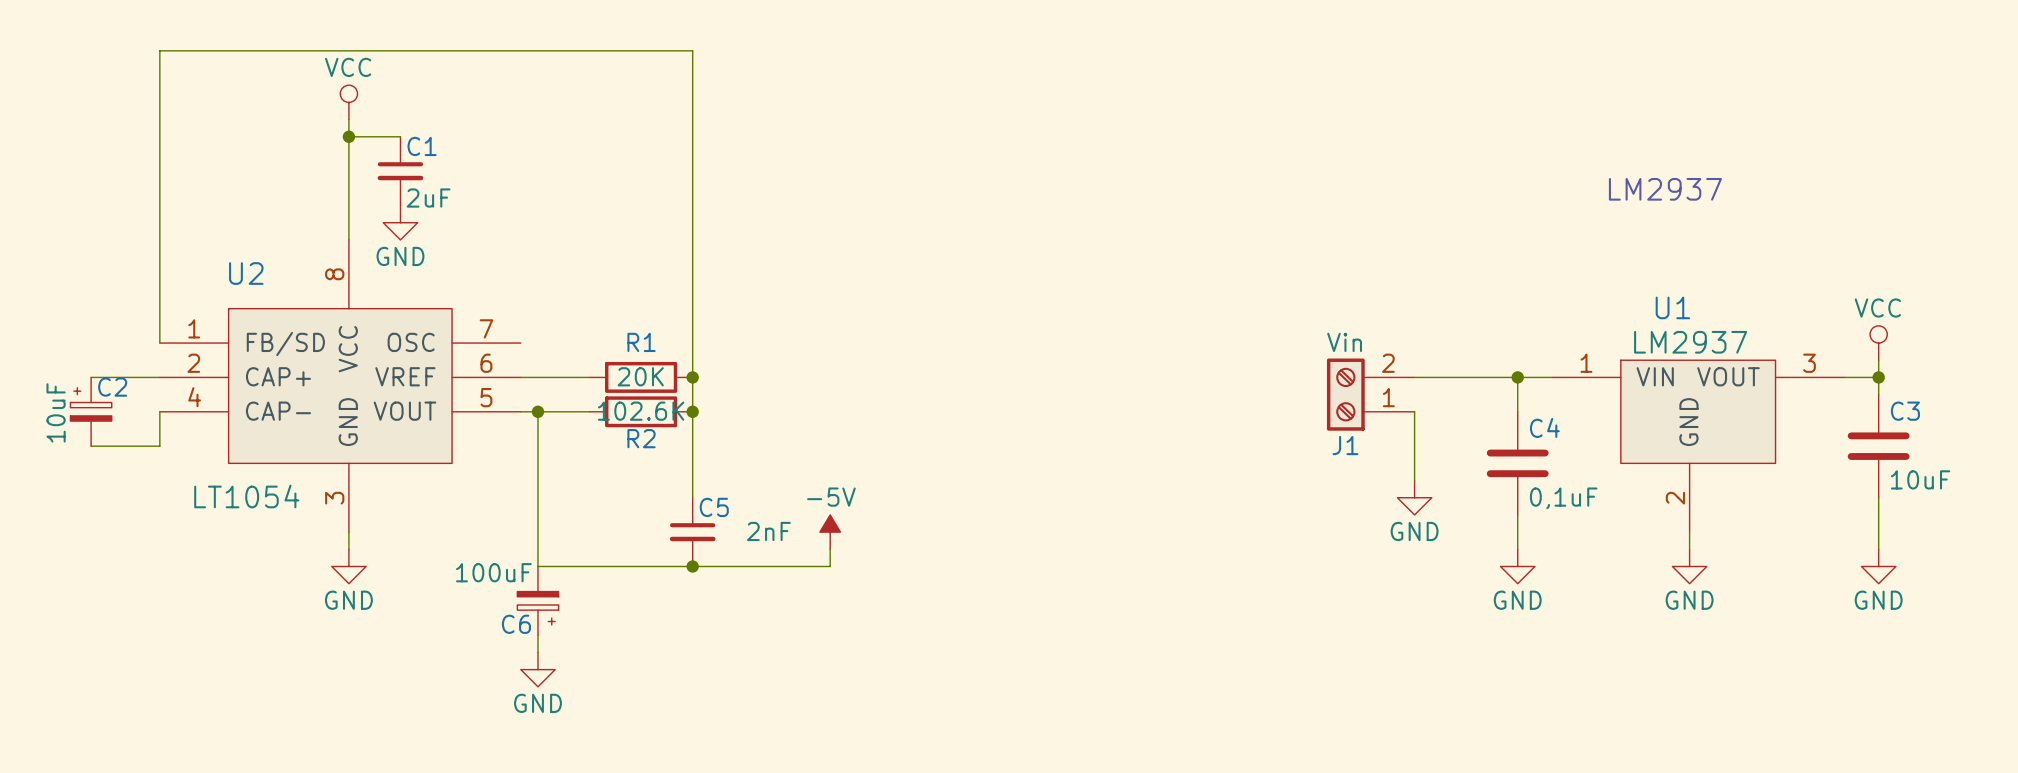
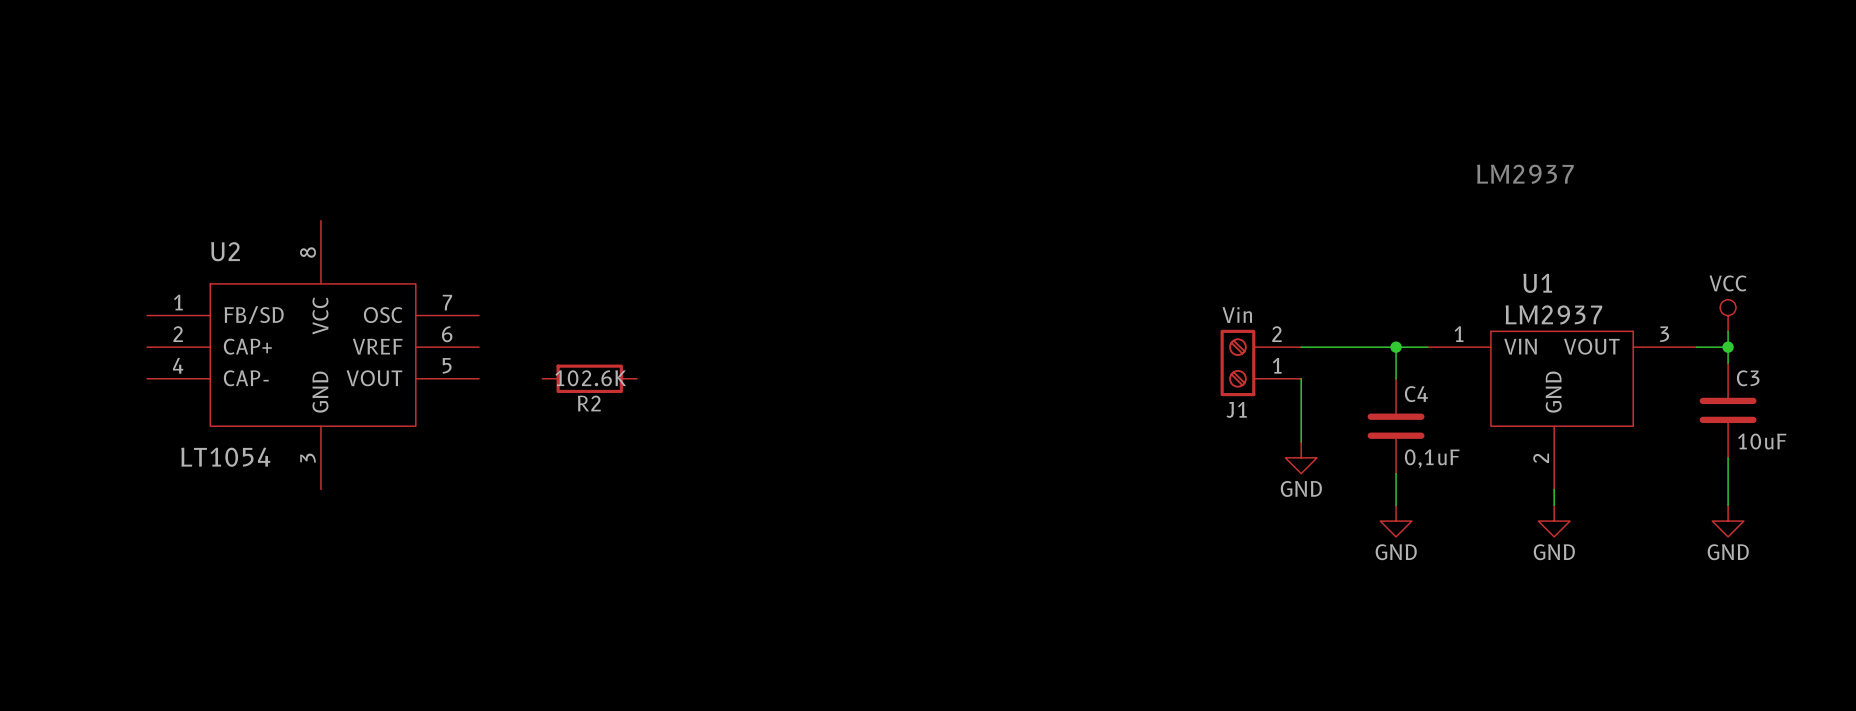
power symbol: VCC (348, 102) -> none
wire: (348, 119) (348, 239) -> none
wire: (348, 136) (400, 136) -> none
junction: (348, 136) -> none
C1: 2uF (400, 171) -> none
power symbol: GND (400, 222) -> none
wire: (159, 343) (159, 50) (692, 50) (692, 497) -> none
wire: (91, 377) (159, 377) -> none
wire: (520, 377) (589, 377) -> none
R1: 20K (641, 377) -> none
junction: (692, 377) -> none
C2: 10uF (91, 411) -> none
wire: (159, 411) (159, 446) (91, 446) -> none
wire: (520, 411) (589, 411) -> none
wire: (537, 411) (537, 566) (830, 566) (830, 549) -> none
junction: (537, 411) -> none
junction: (692, 411) -> none
wire: (348, 532) (348, 549) -> none
C5: 2nF (692, 532) -> none
power symbol: -5V (830, 532) -> none
power symbol: GND (348, 566) -> none
junction: (692, 566) -> none
C6: 100uF (537, 600) -> none
wire: (537, 635) (537, 652) -> none
power symbol: GND (537, 669) -> none

